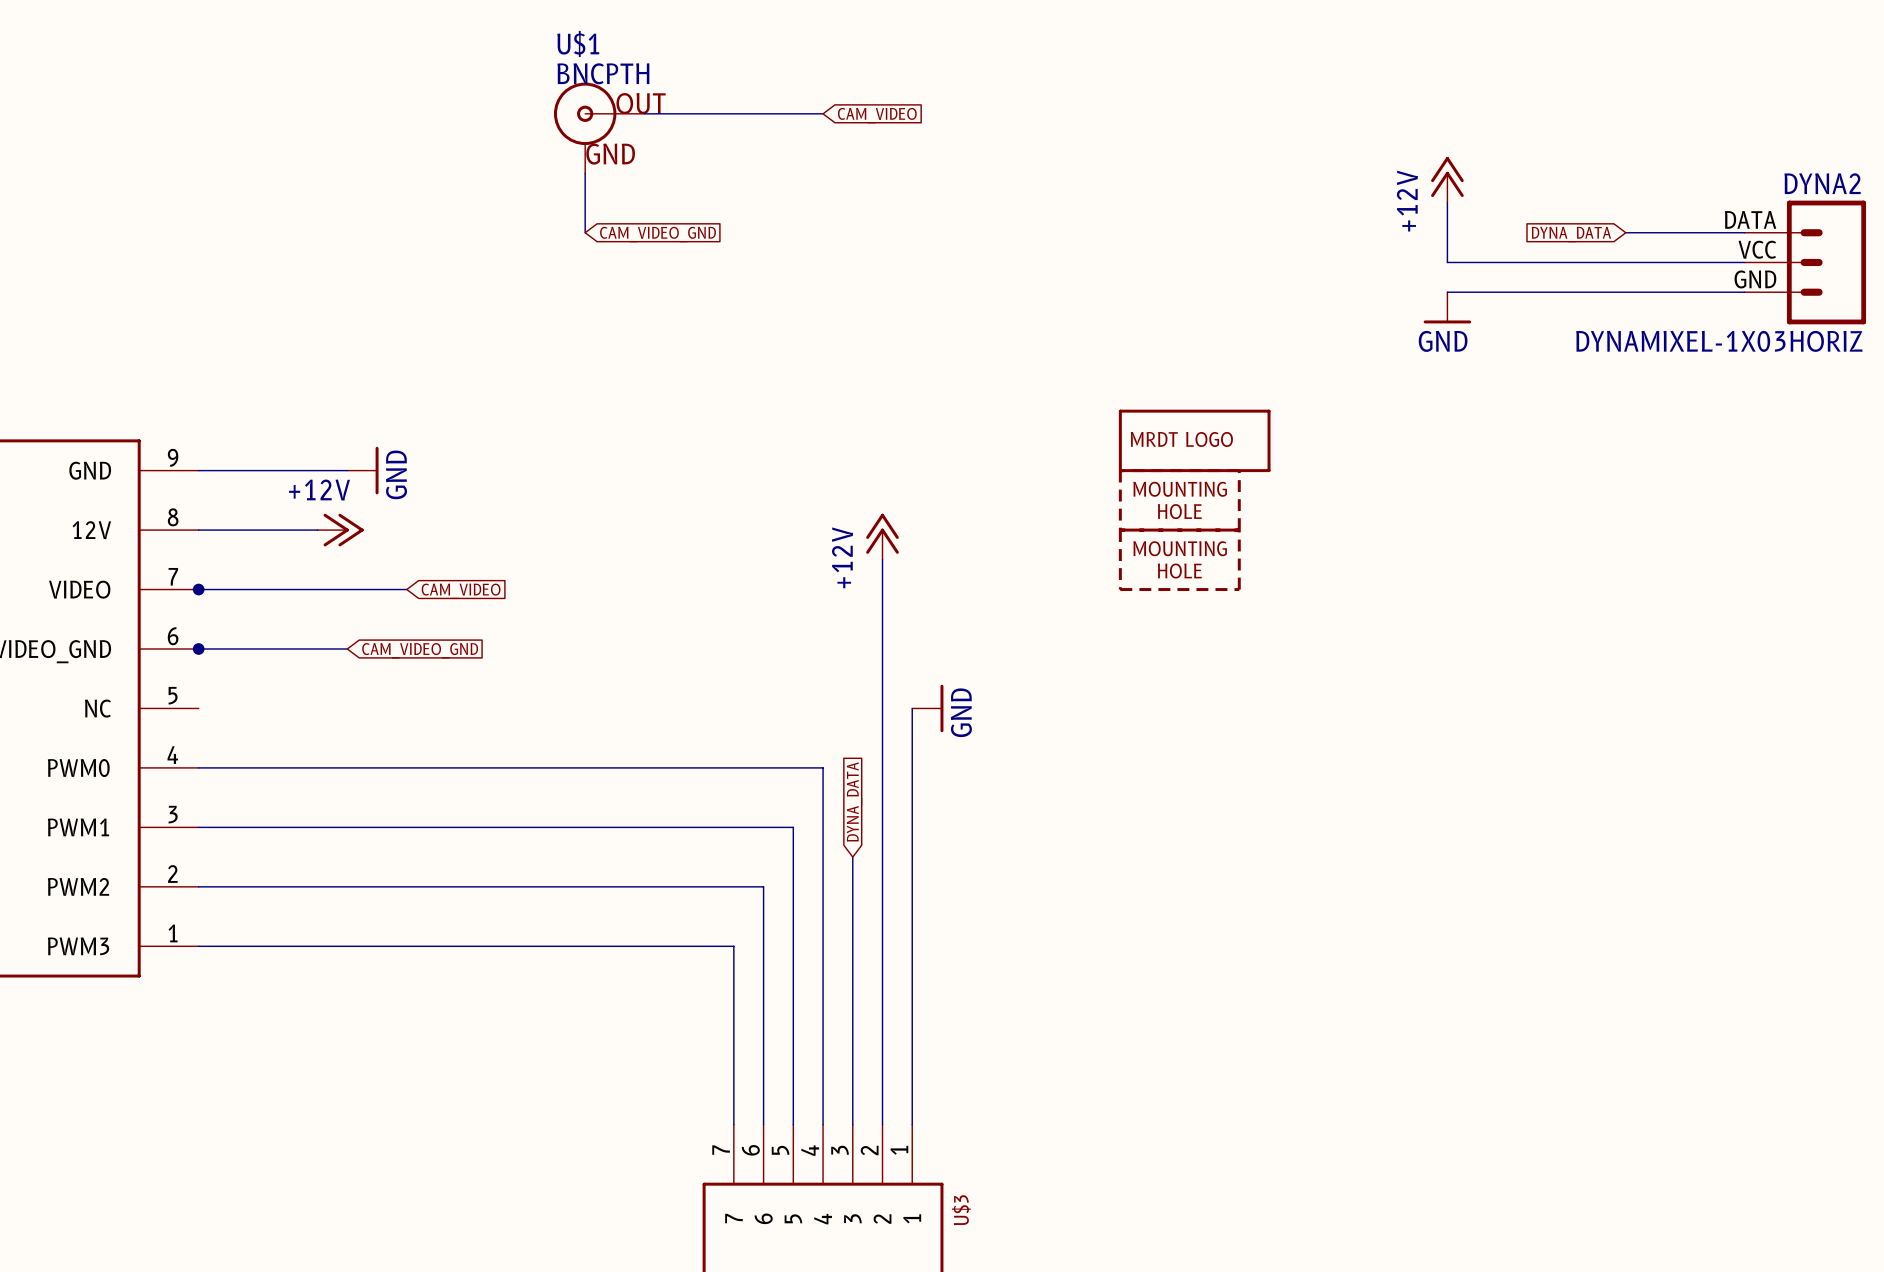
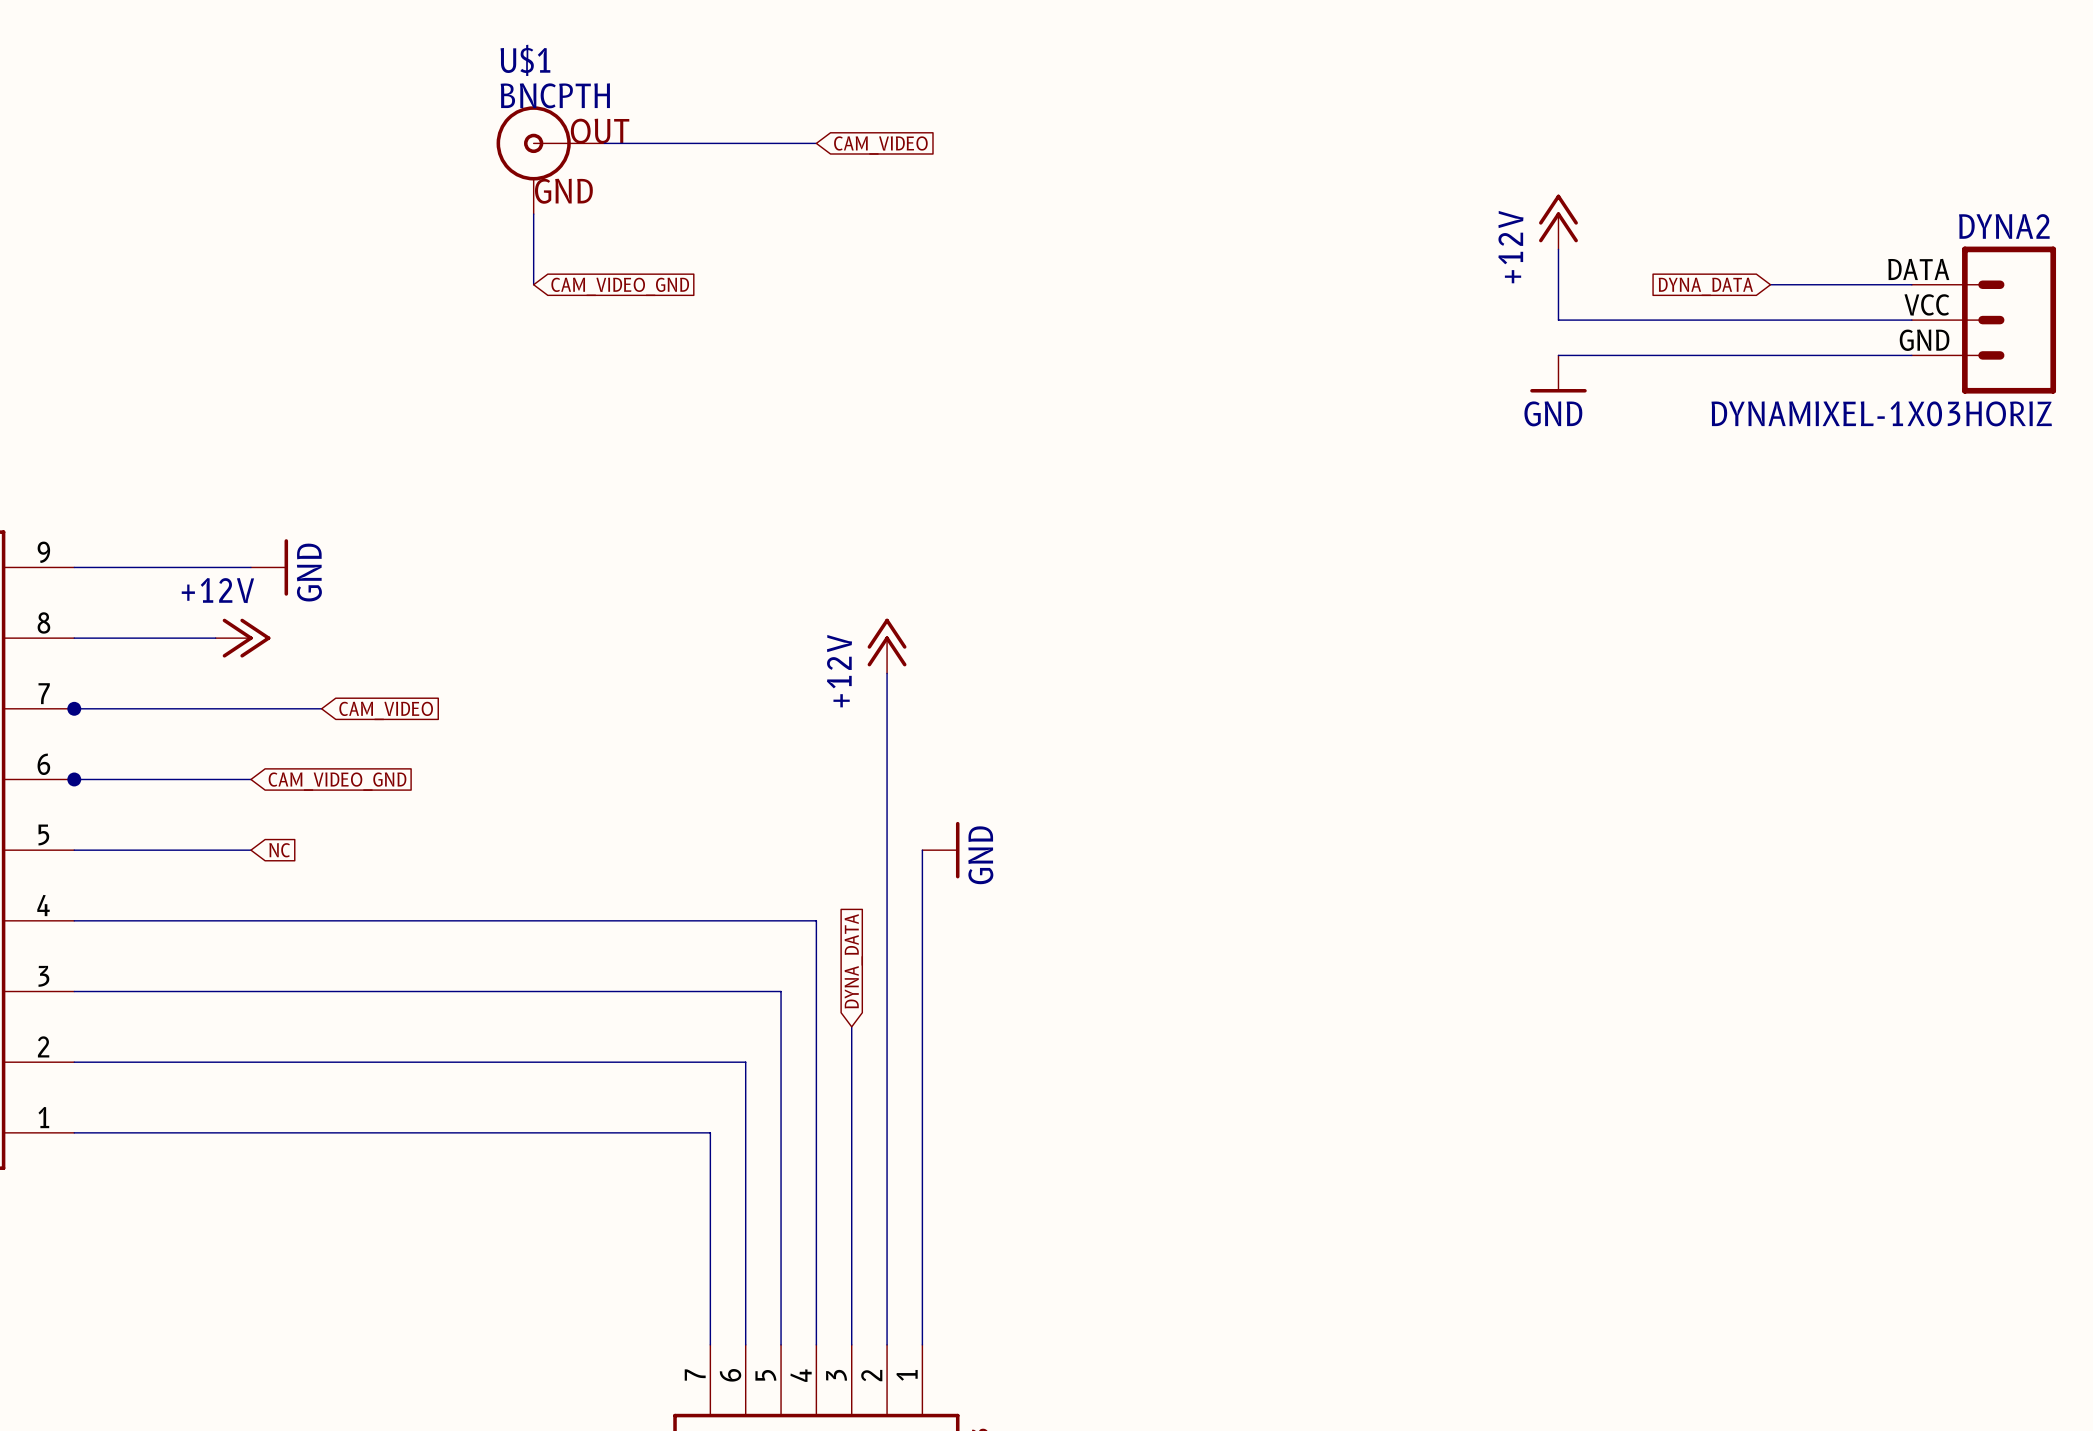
part: (1194, 440) -> none
part: (1179, 500) -> none
part: (1179, 559) -> none
wire: none -> (74, 850) (250, 850)
global label: none -> NC (279, 850)

